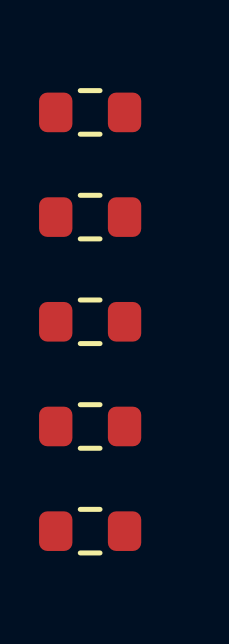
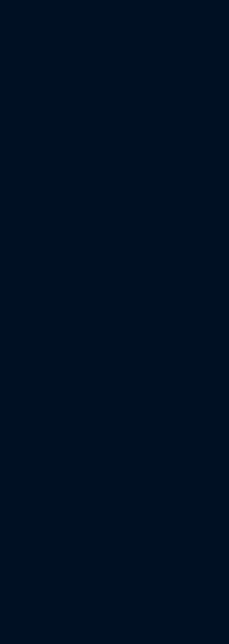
part: (90, 112) -> none
part: (90, 217) -> none
part: (90, 321) -> none
part: (90, 426) -> none
part: (90, 531) -> none

